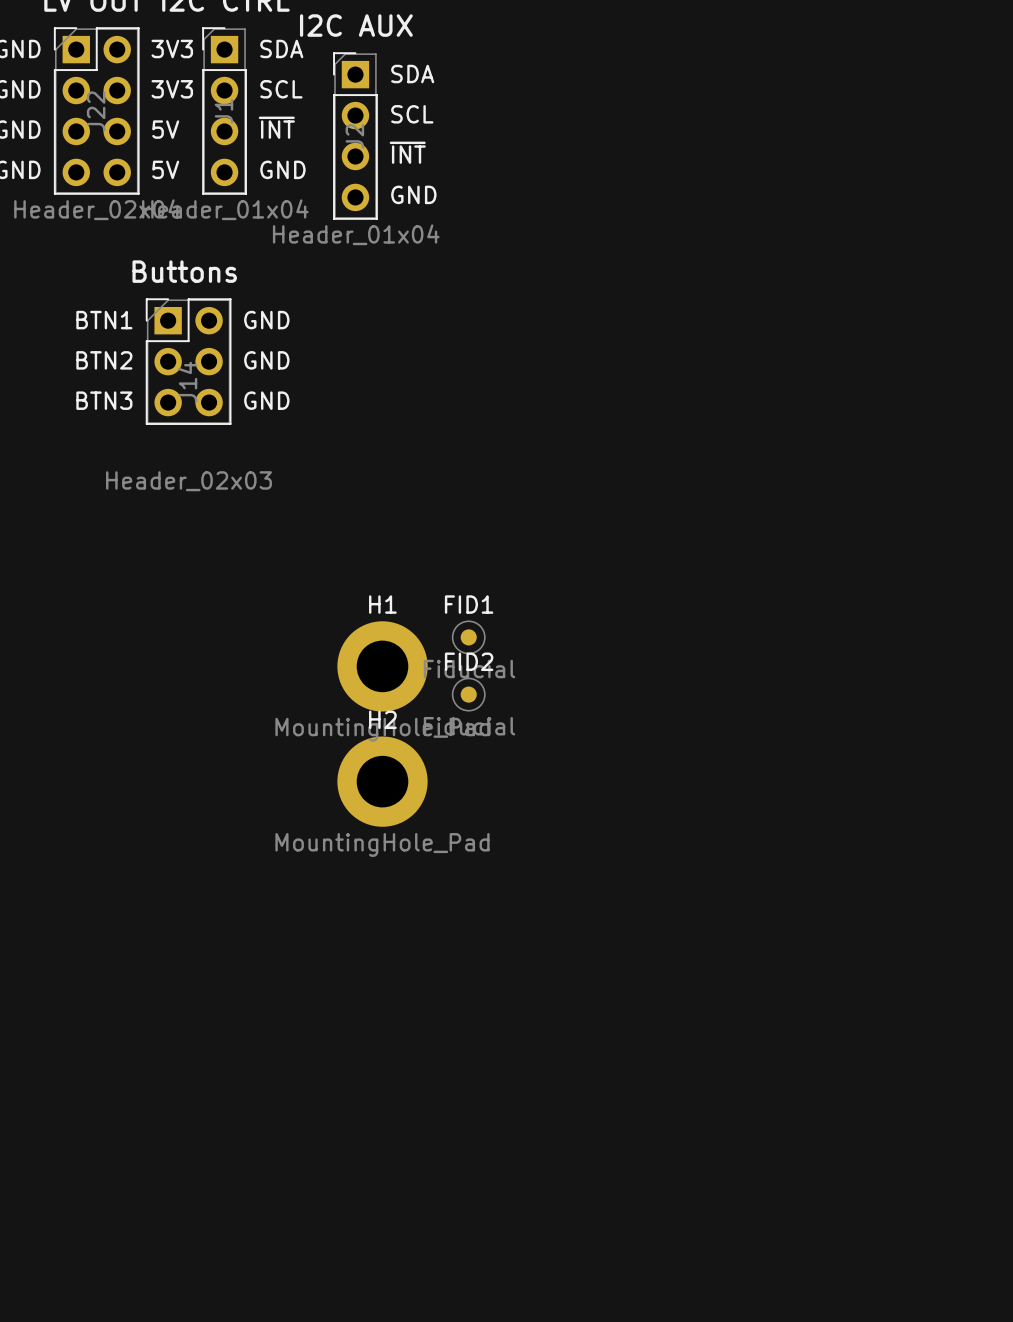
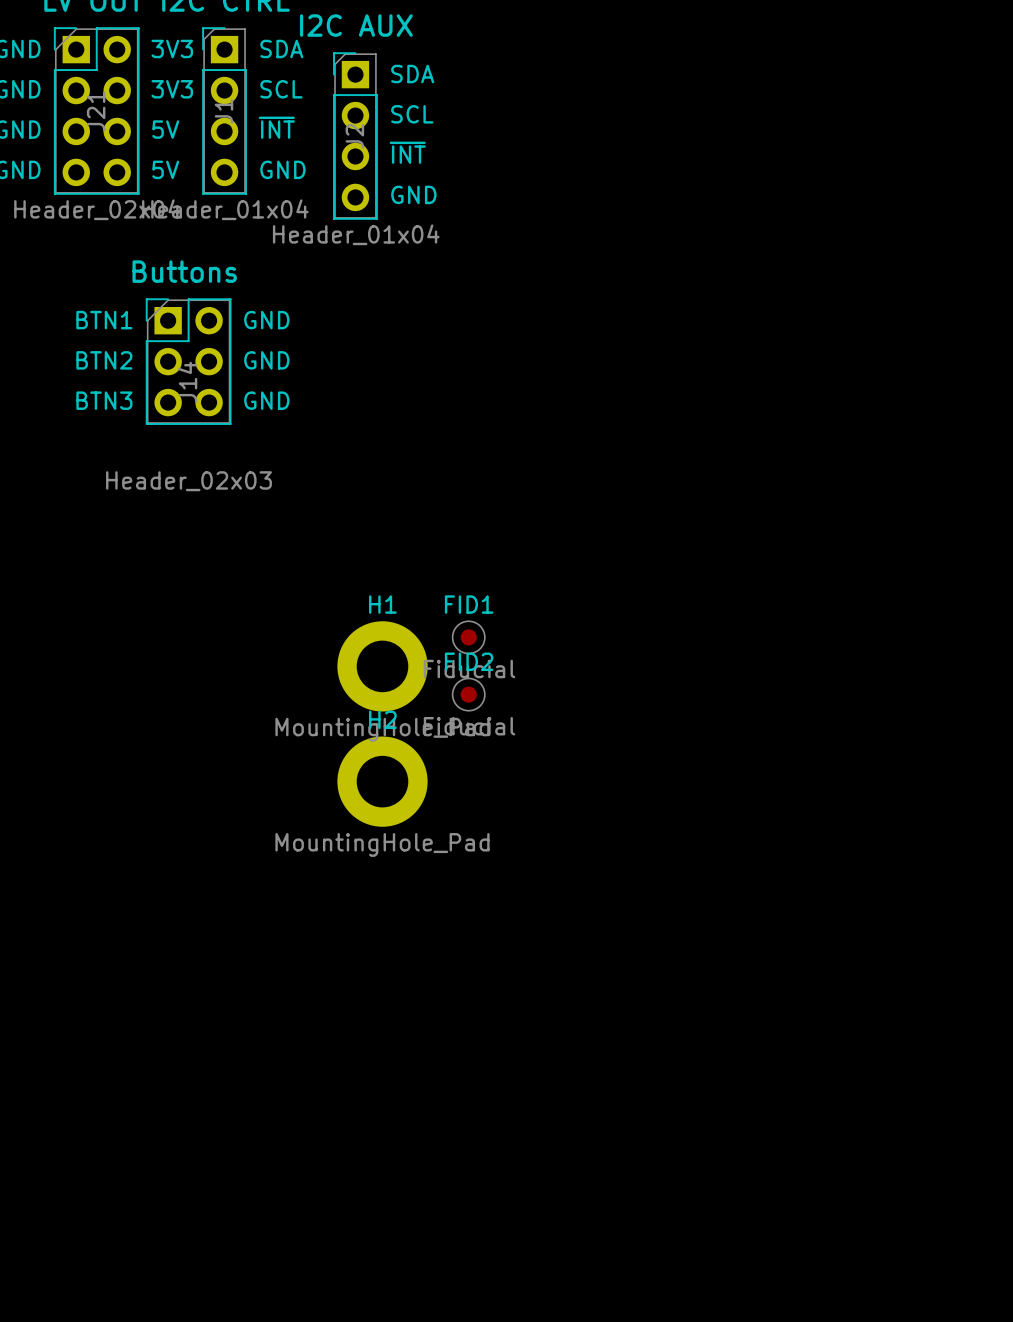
J22 name: J22 (96, 111) -> J21 (96, 111)

